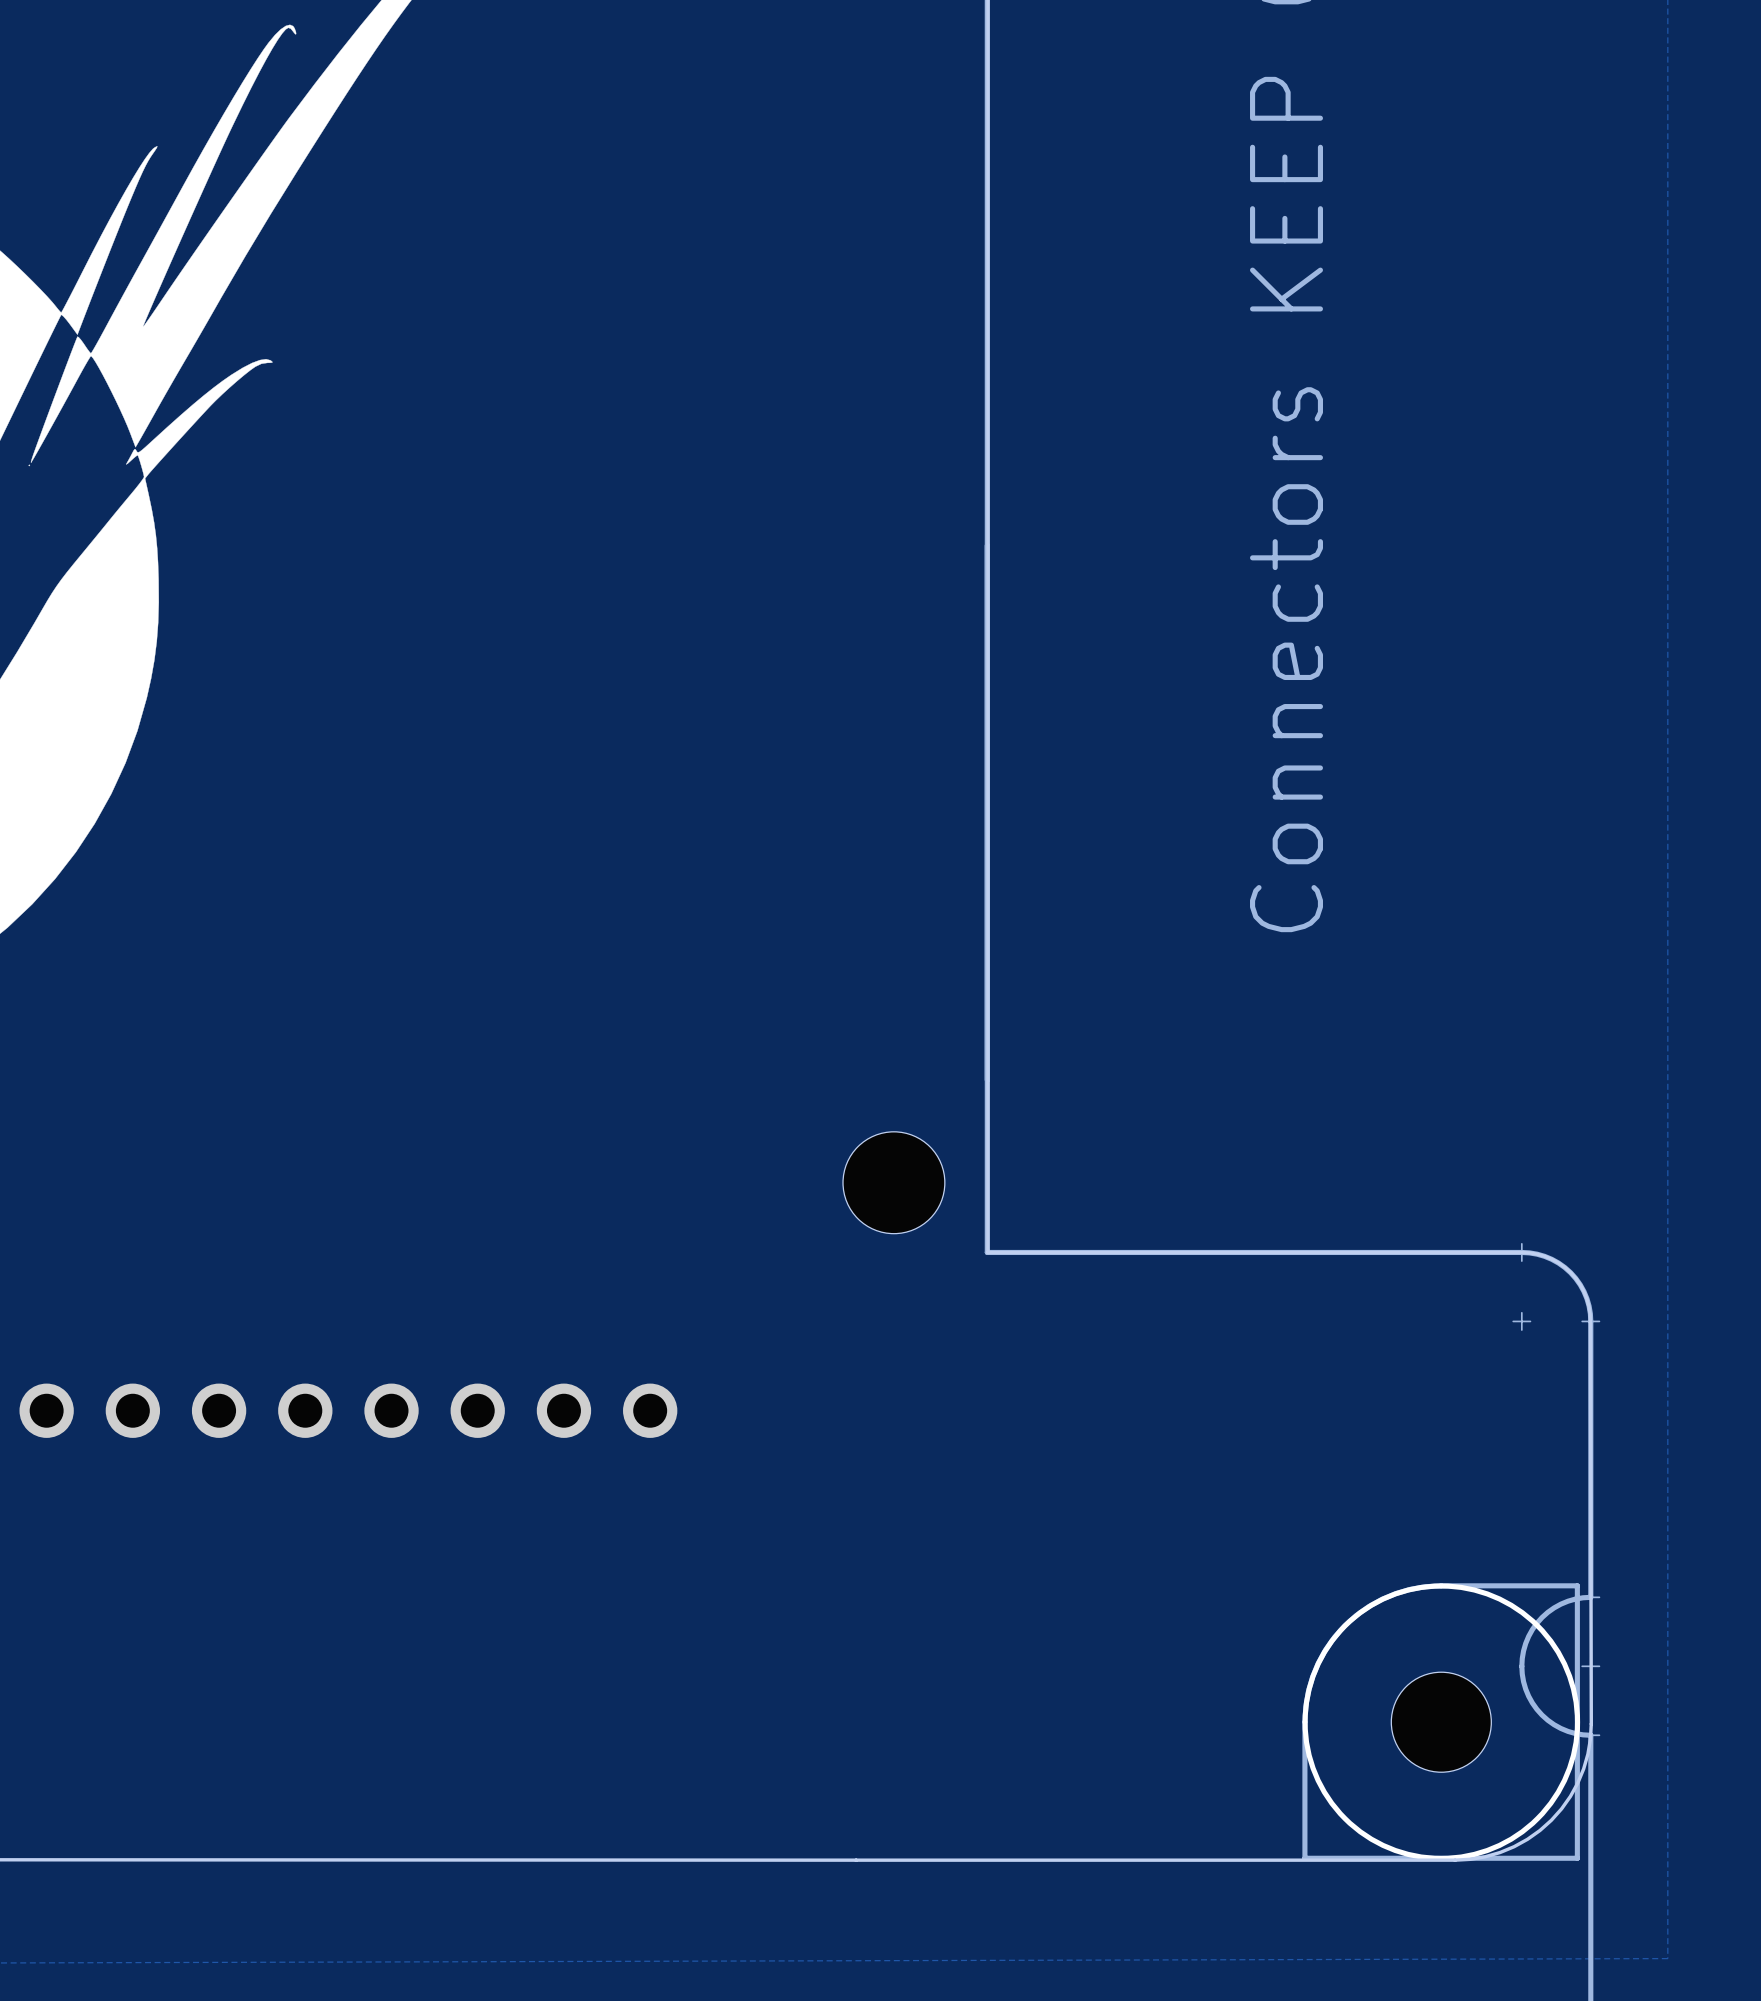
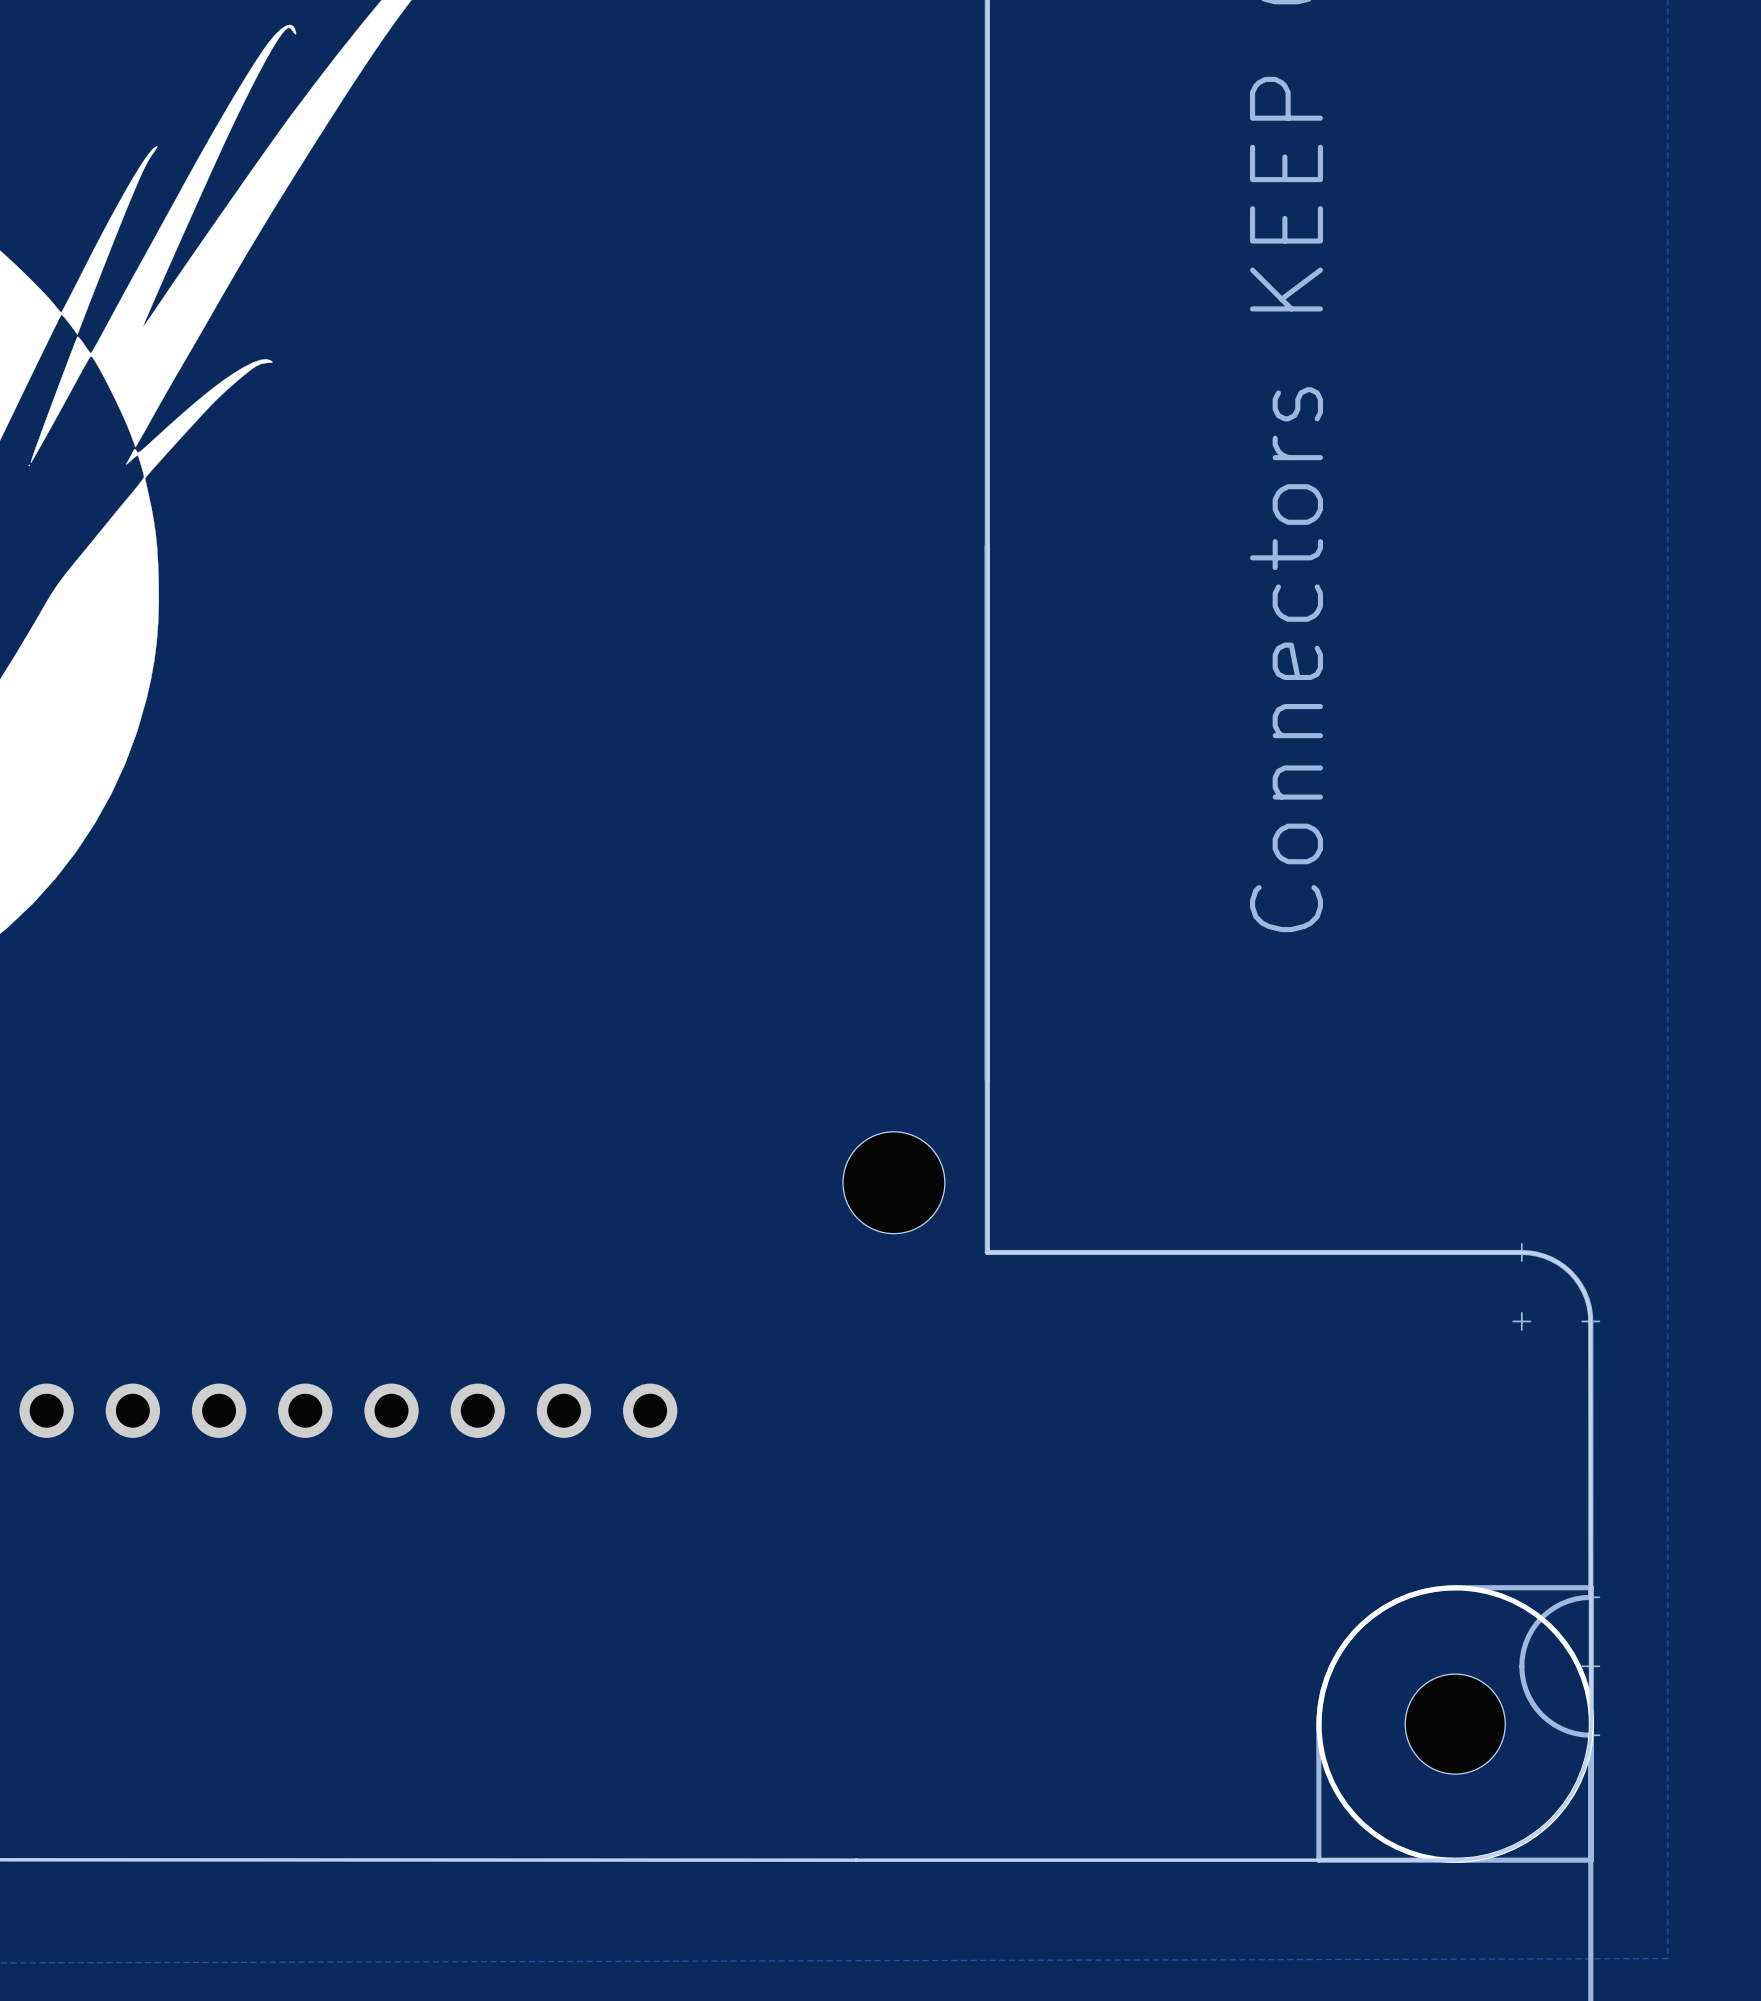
part position: (1441, 1722) -> (1455, 1724)

